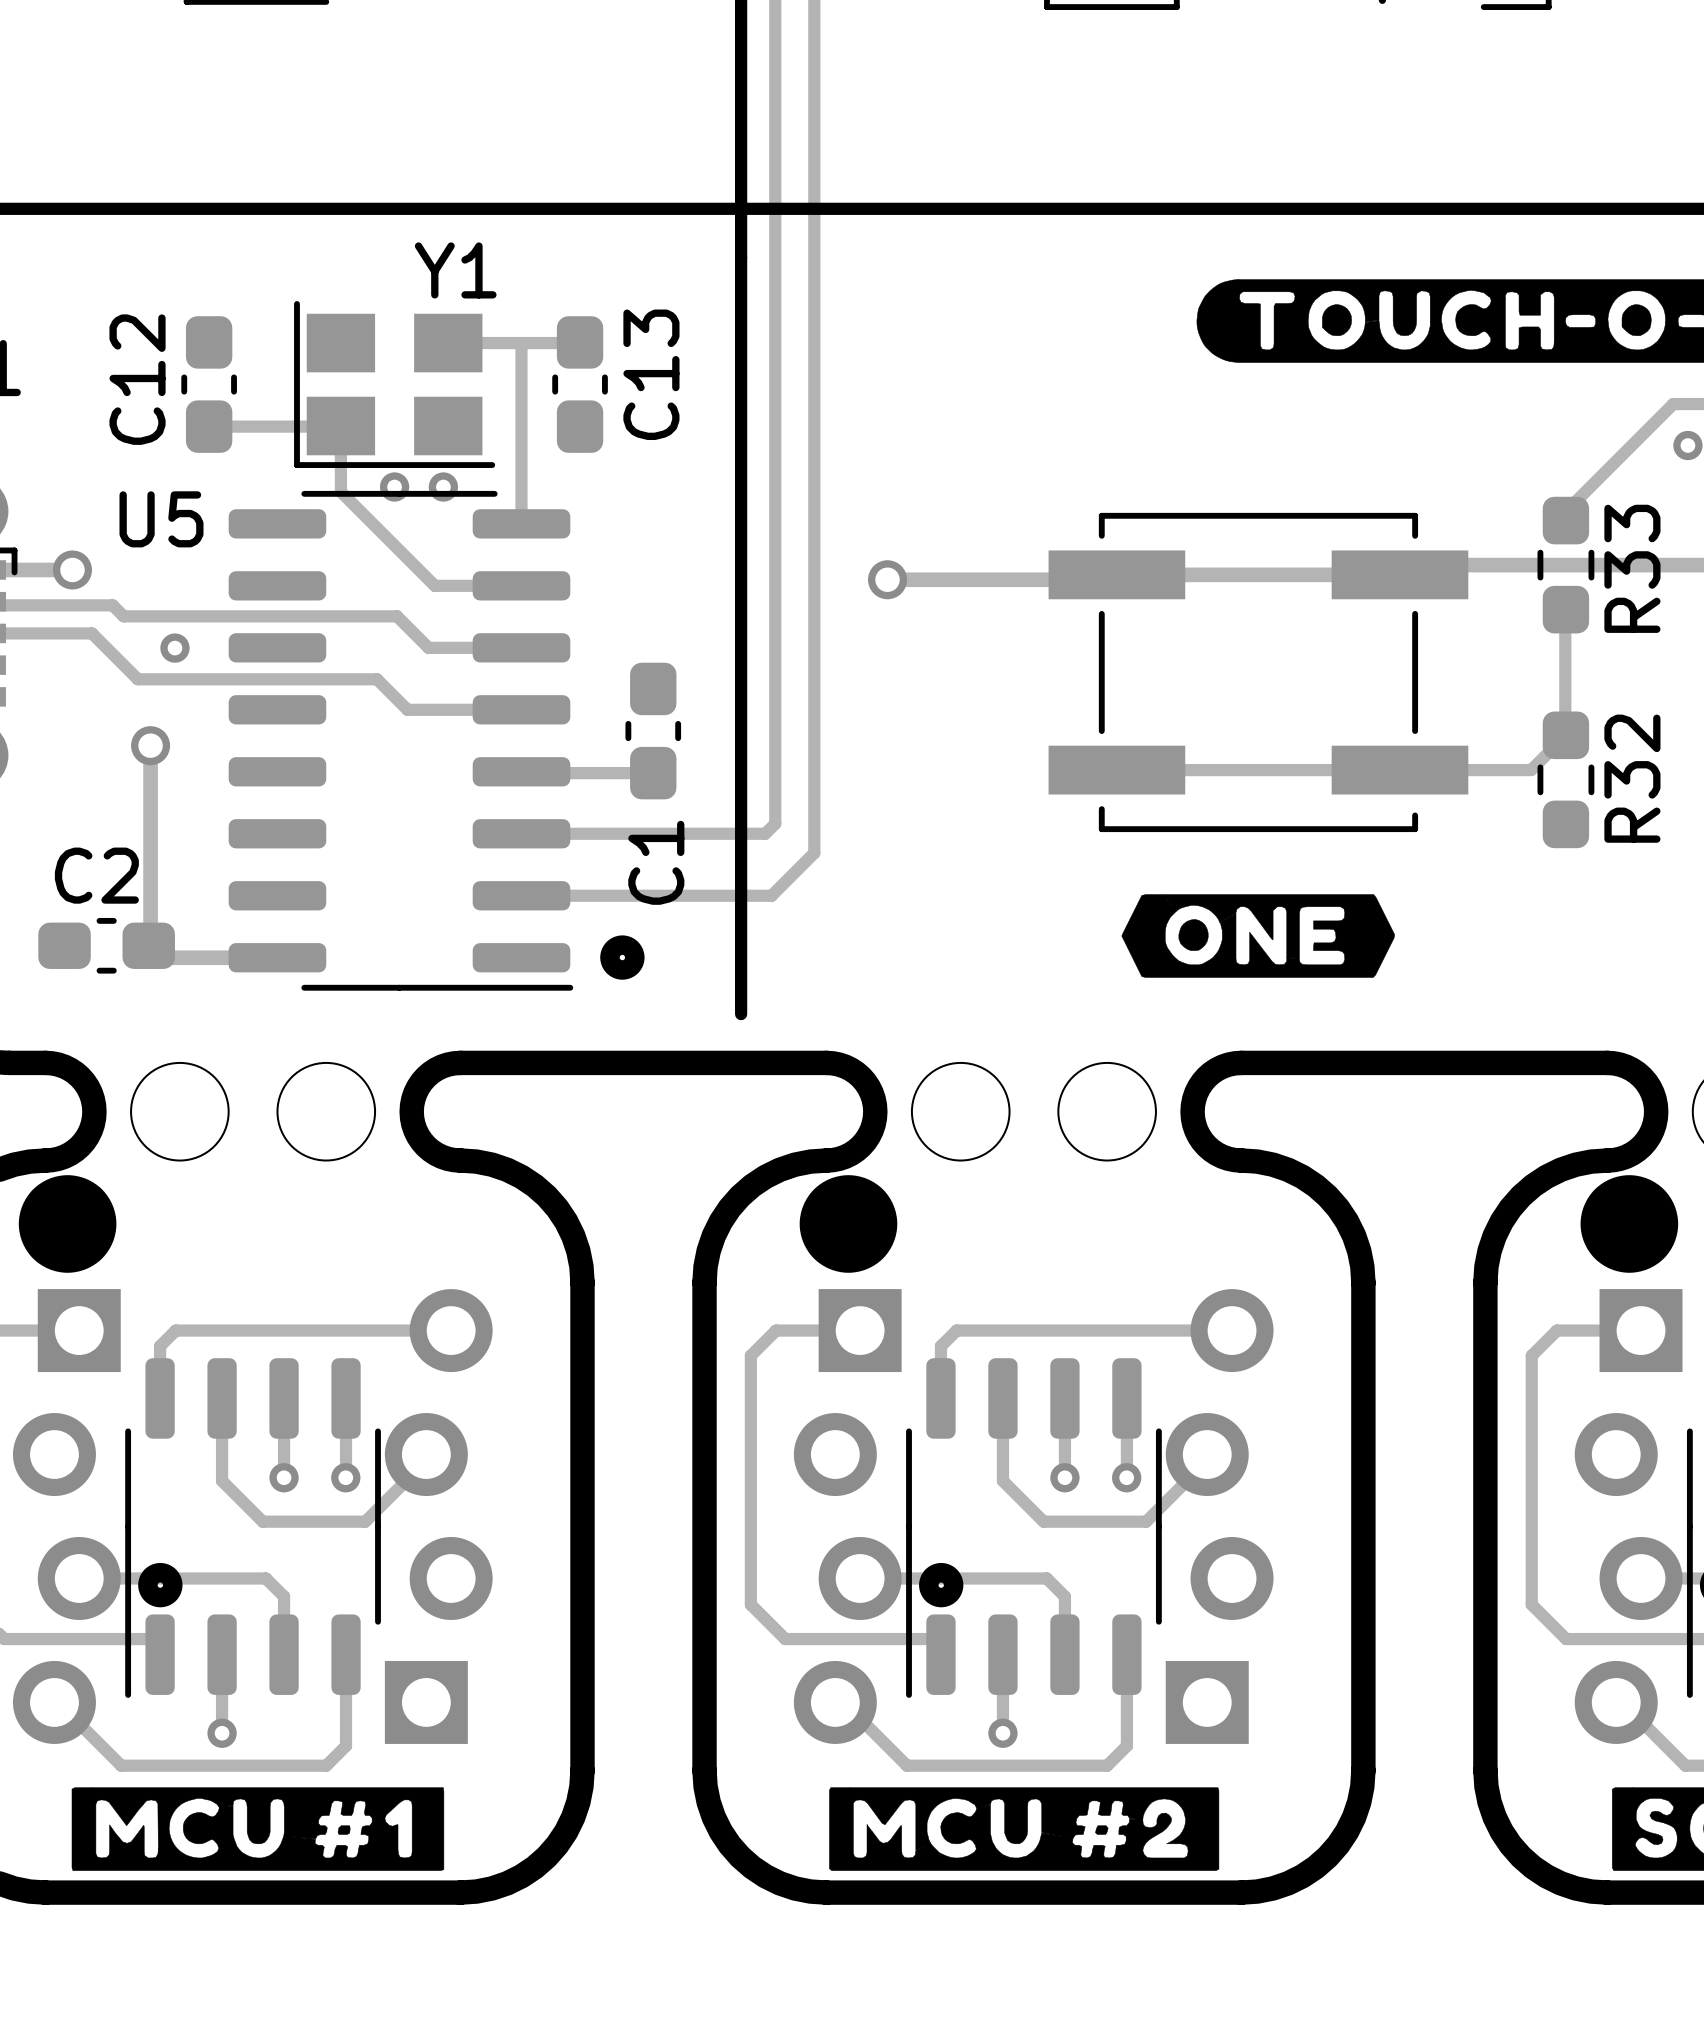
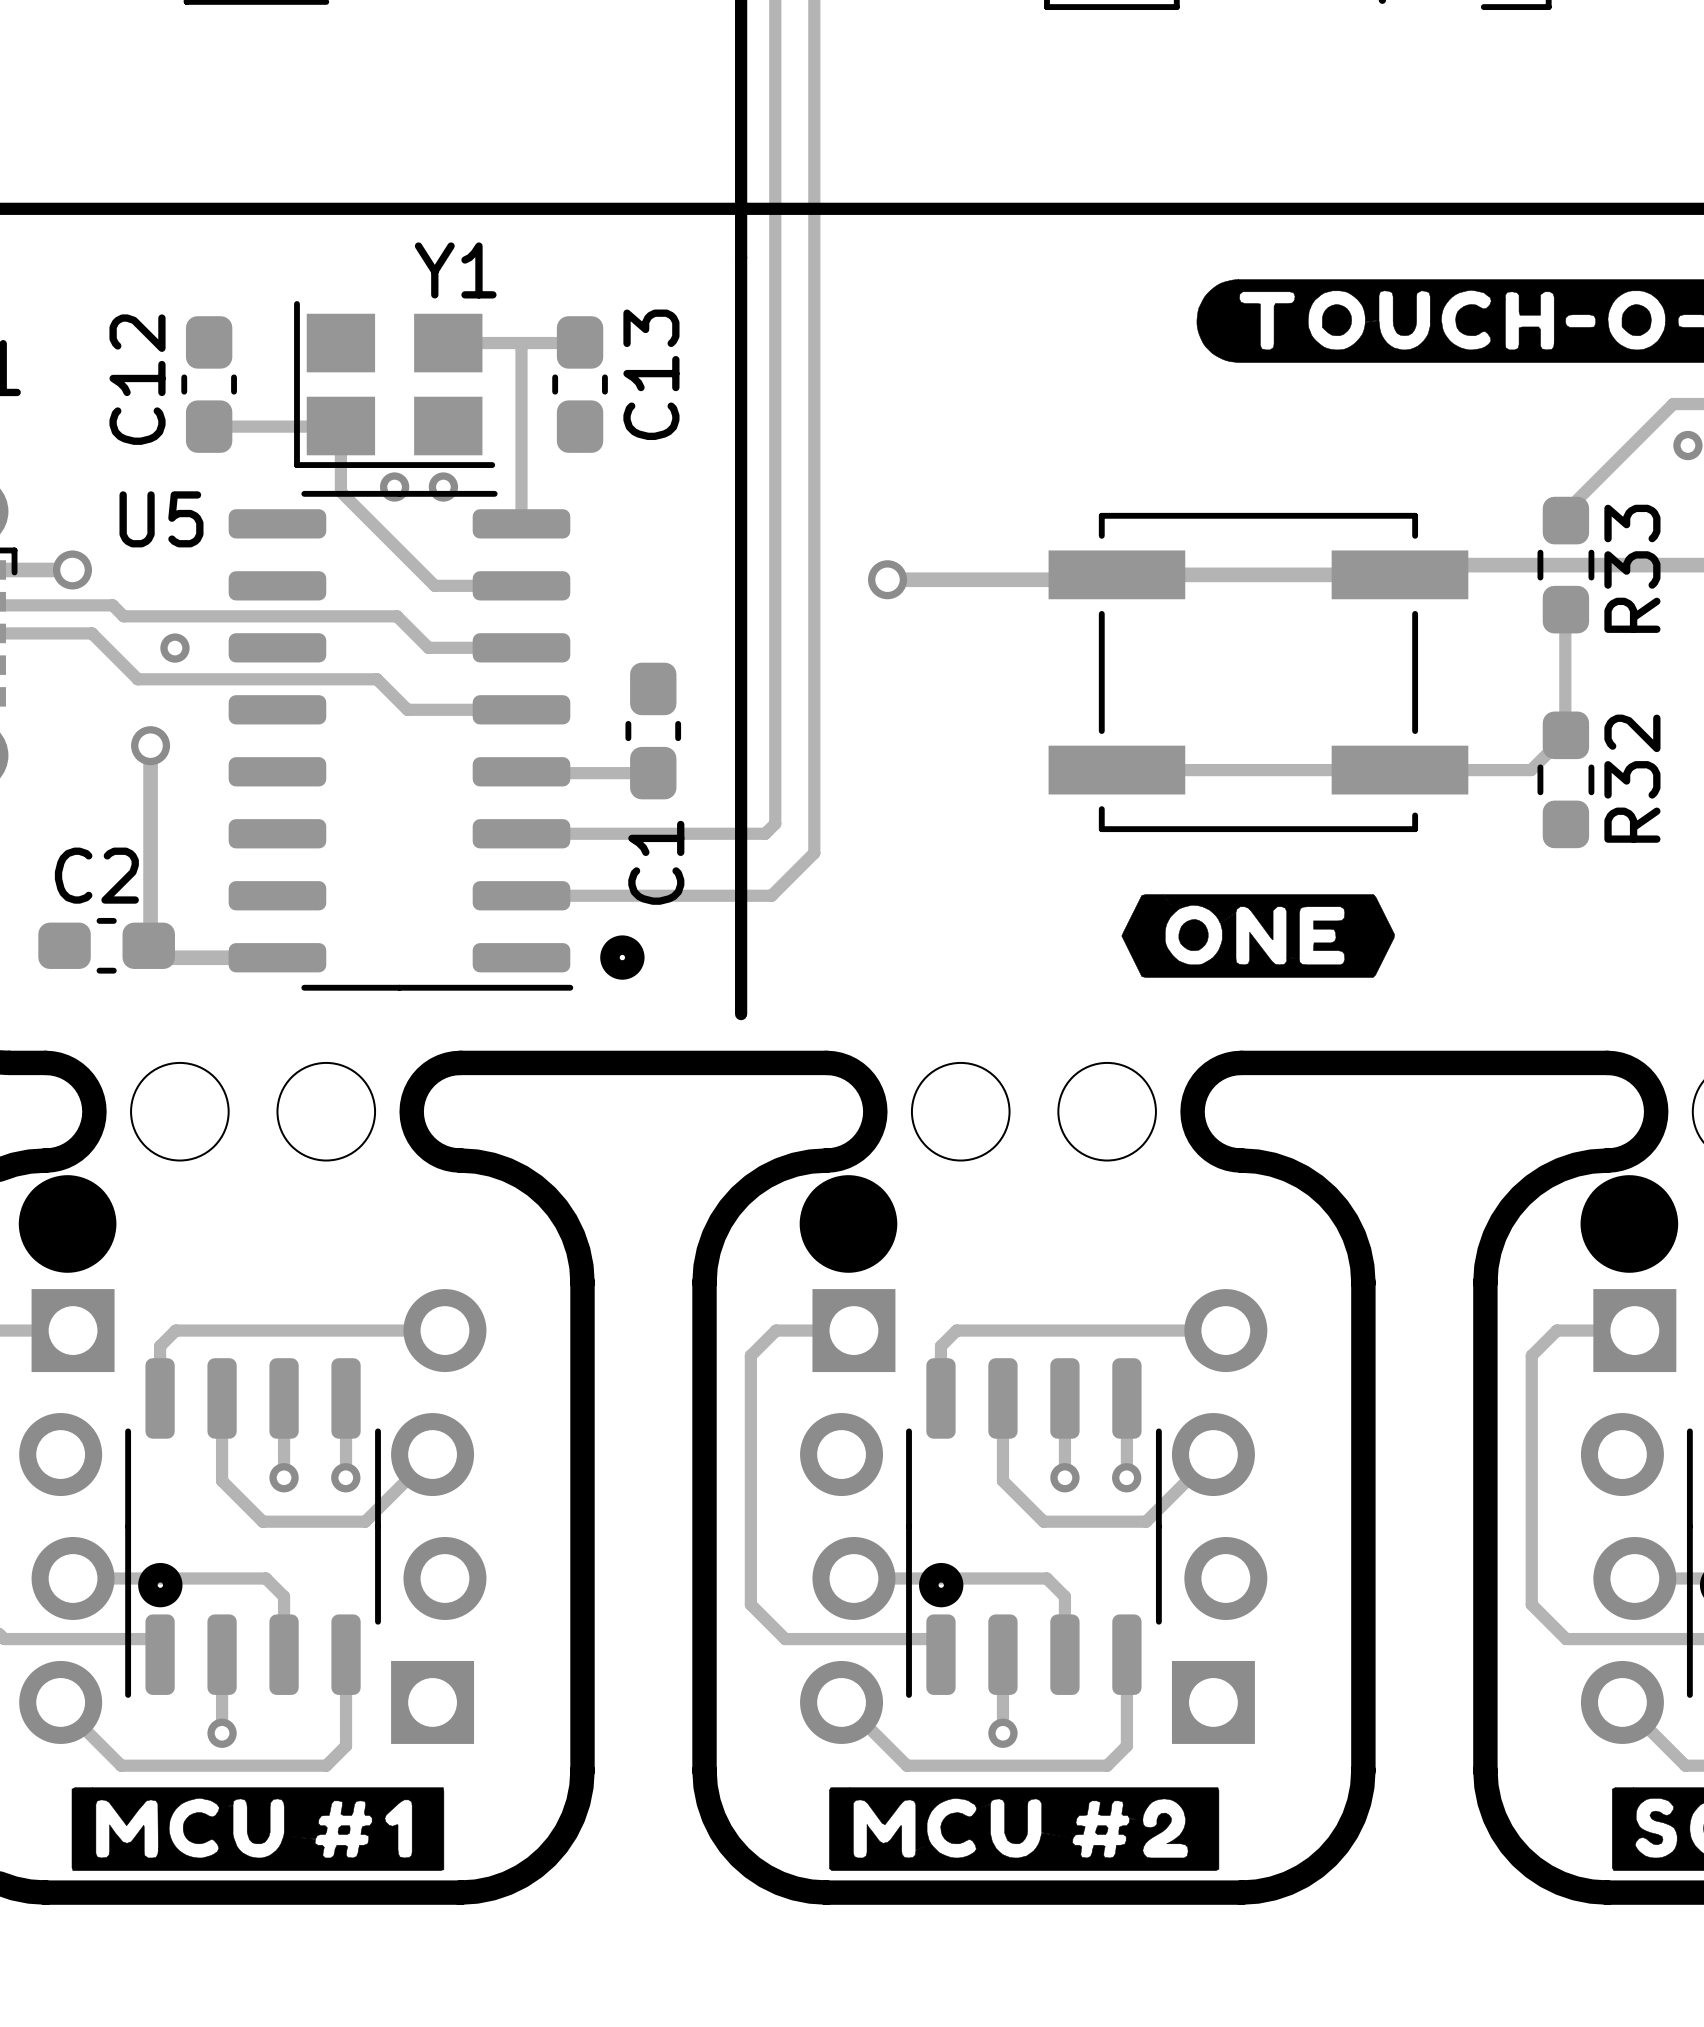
part footprint: [12, 1289, 121, 1744] -> [19, 1289, 115, 1744]
part footprint: [384, 1289, 493, 1744] -> [391, 1289, 487, 1744]
part footprint: [793, 1289, 902, 1744] -> [800, 1289, 896, 1744]
part footprint: [1165, 1289, 1274, 1744] -> [1171, 1289, 1268, 1744]
part footprint: [1574, 1289, 1683, 1744] -> [1580, 1289, 1677, 1744]

